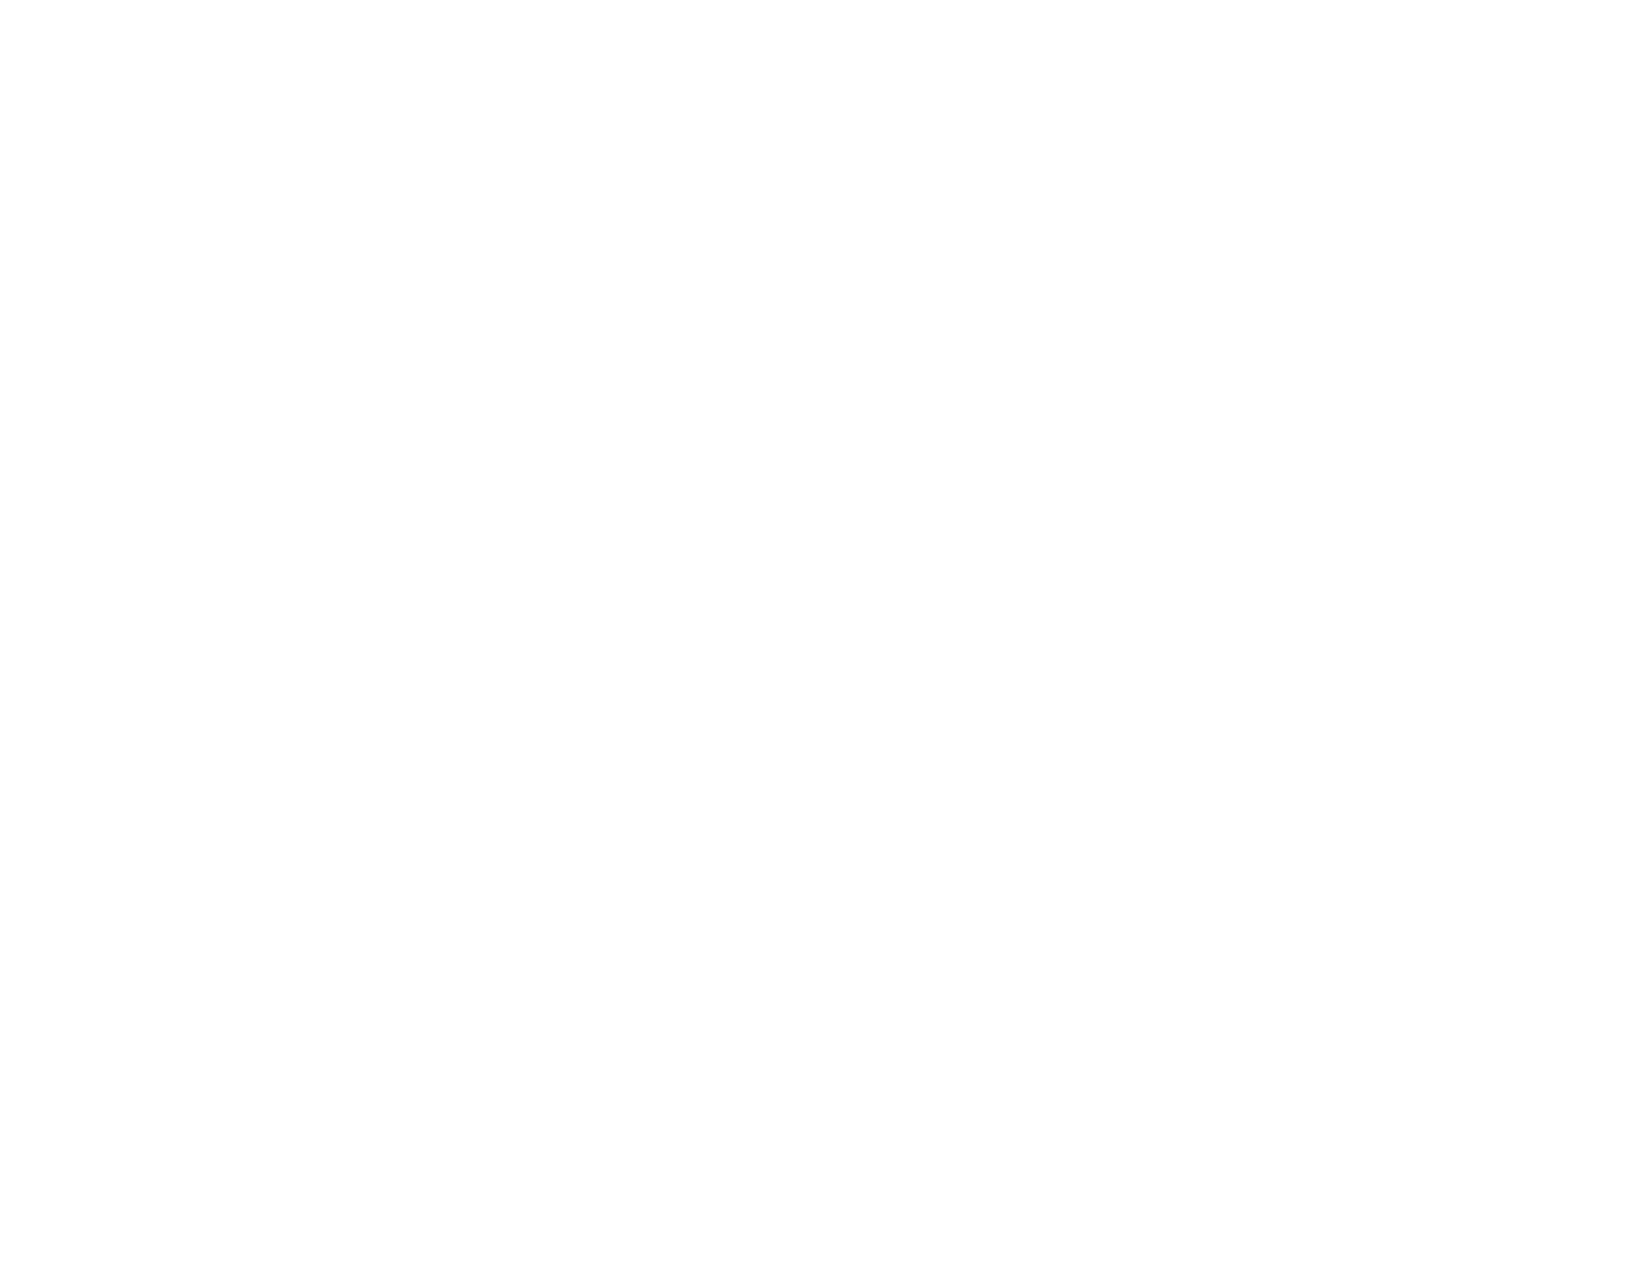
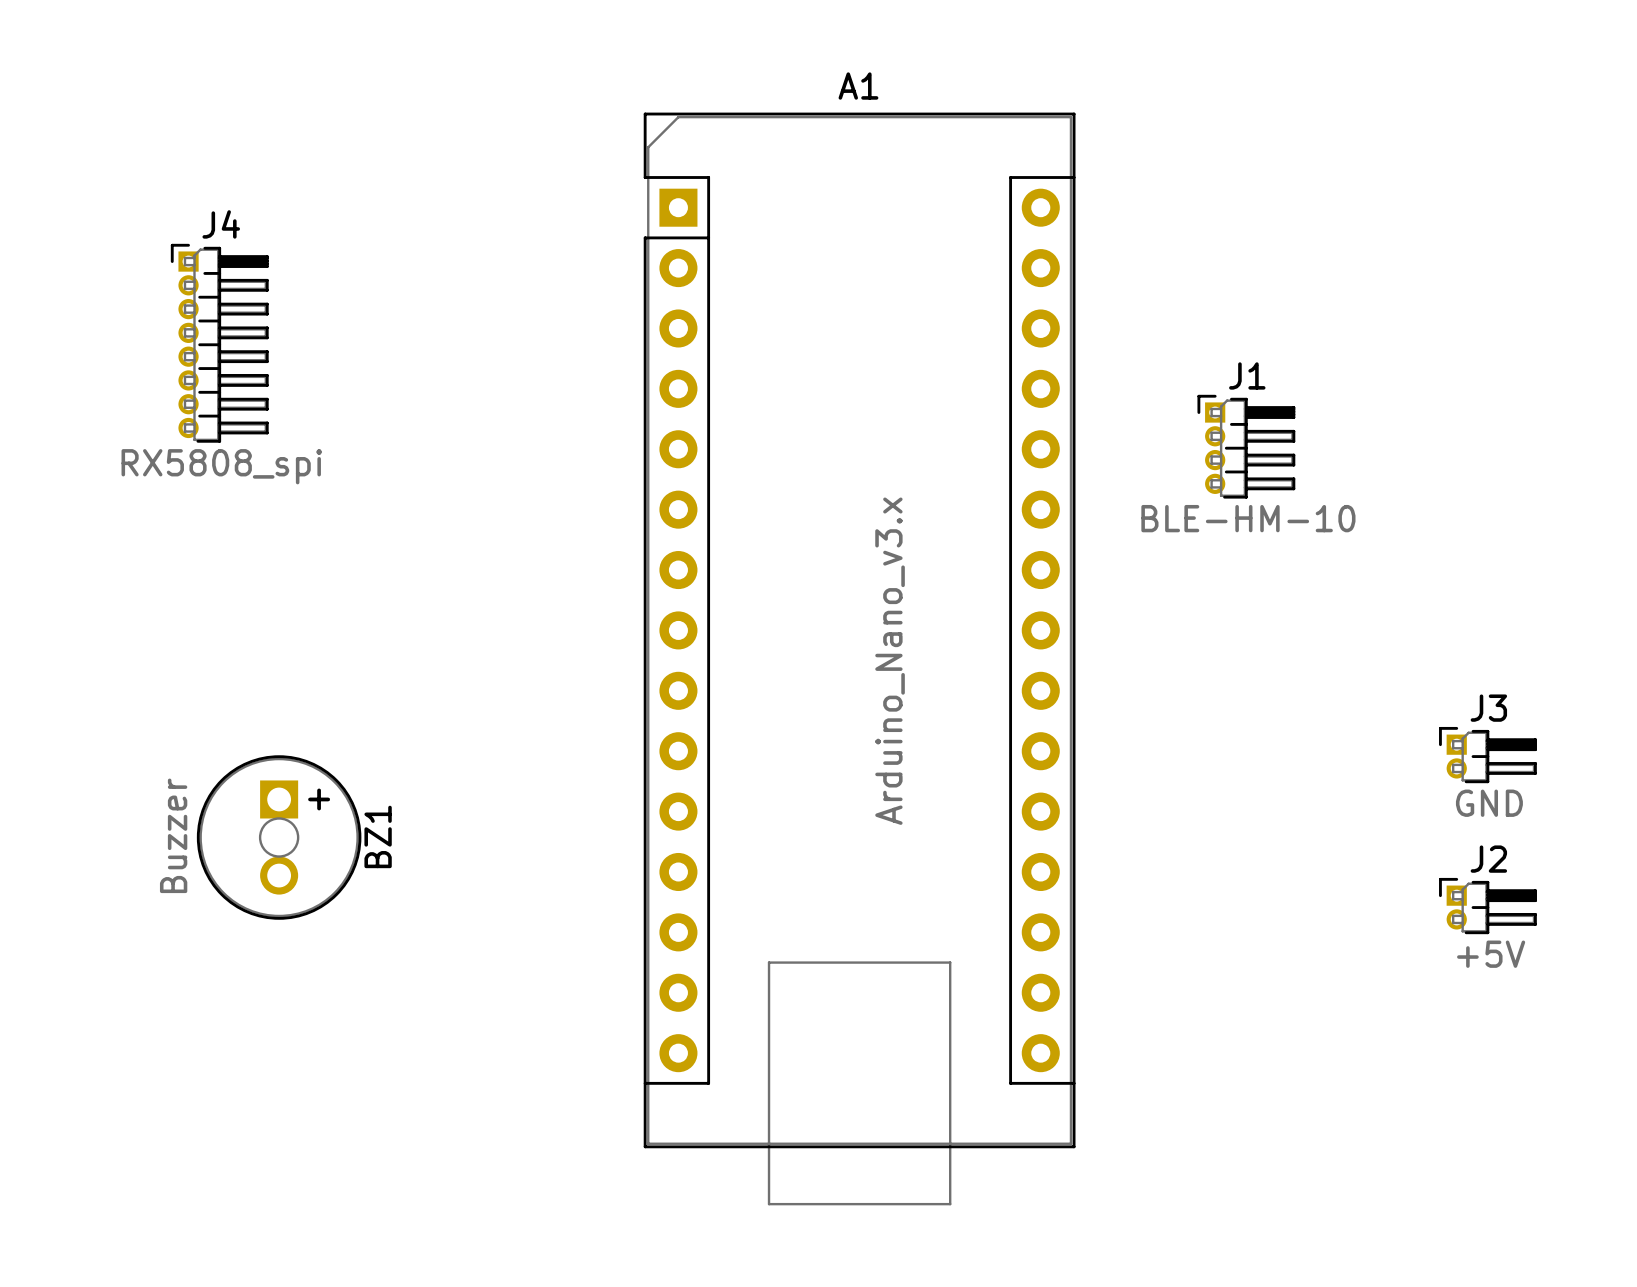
J4: none -> RX5808_spi (219, 343)
J1: none -> BLE-HM-10 (1246, 446)
A1: none -> Arduino_Nano_v3.x (859, 658)
J3: none -> GND (1487, 755)
BZ1: none -> Buzzer (279, 837)
J2: none -> +5V (1487, 906)

